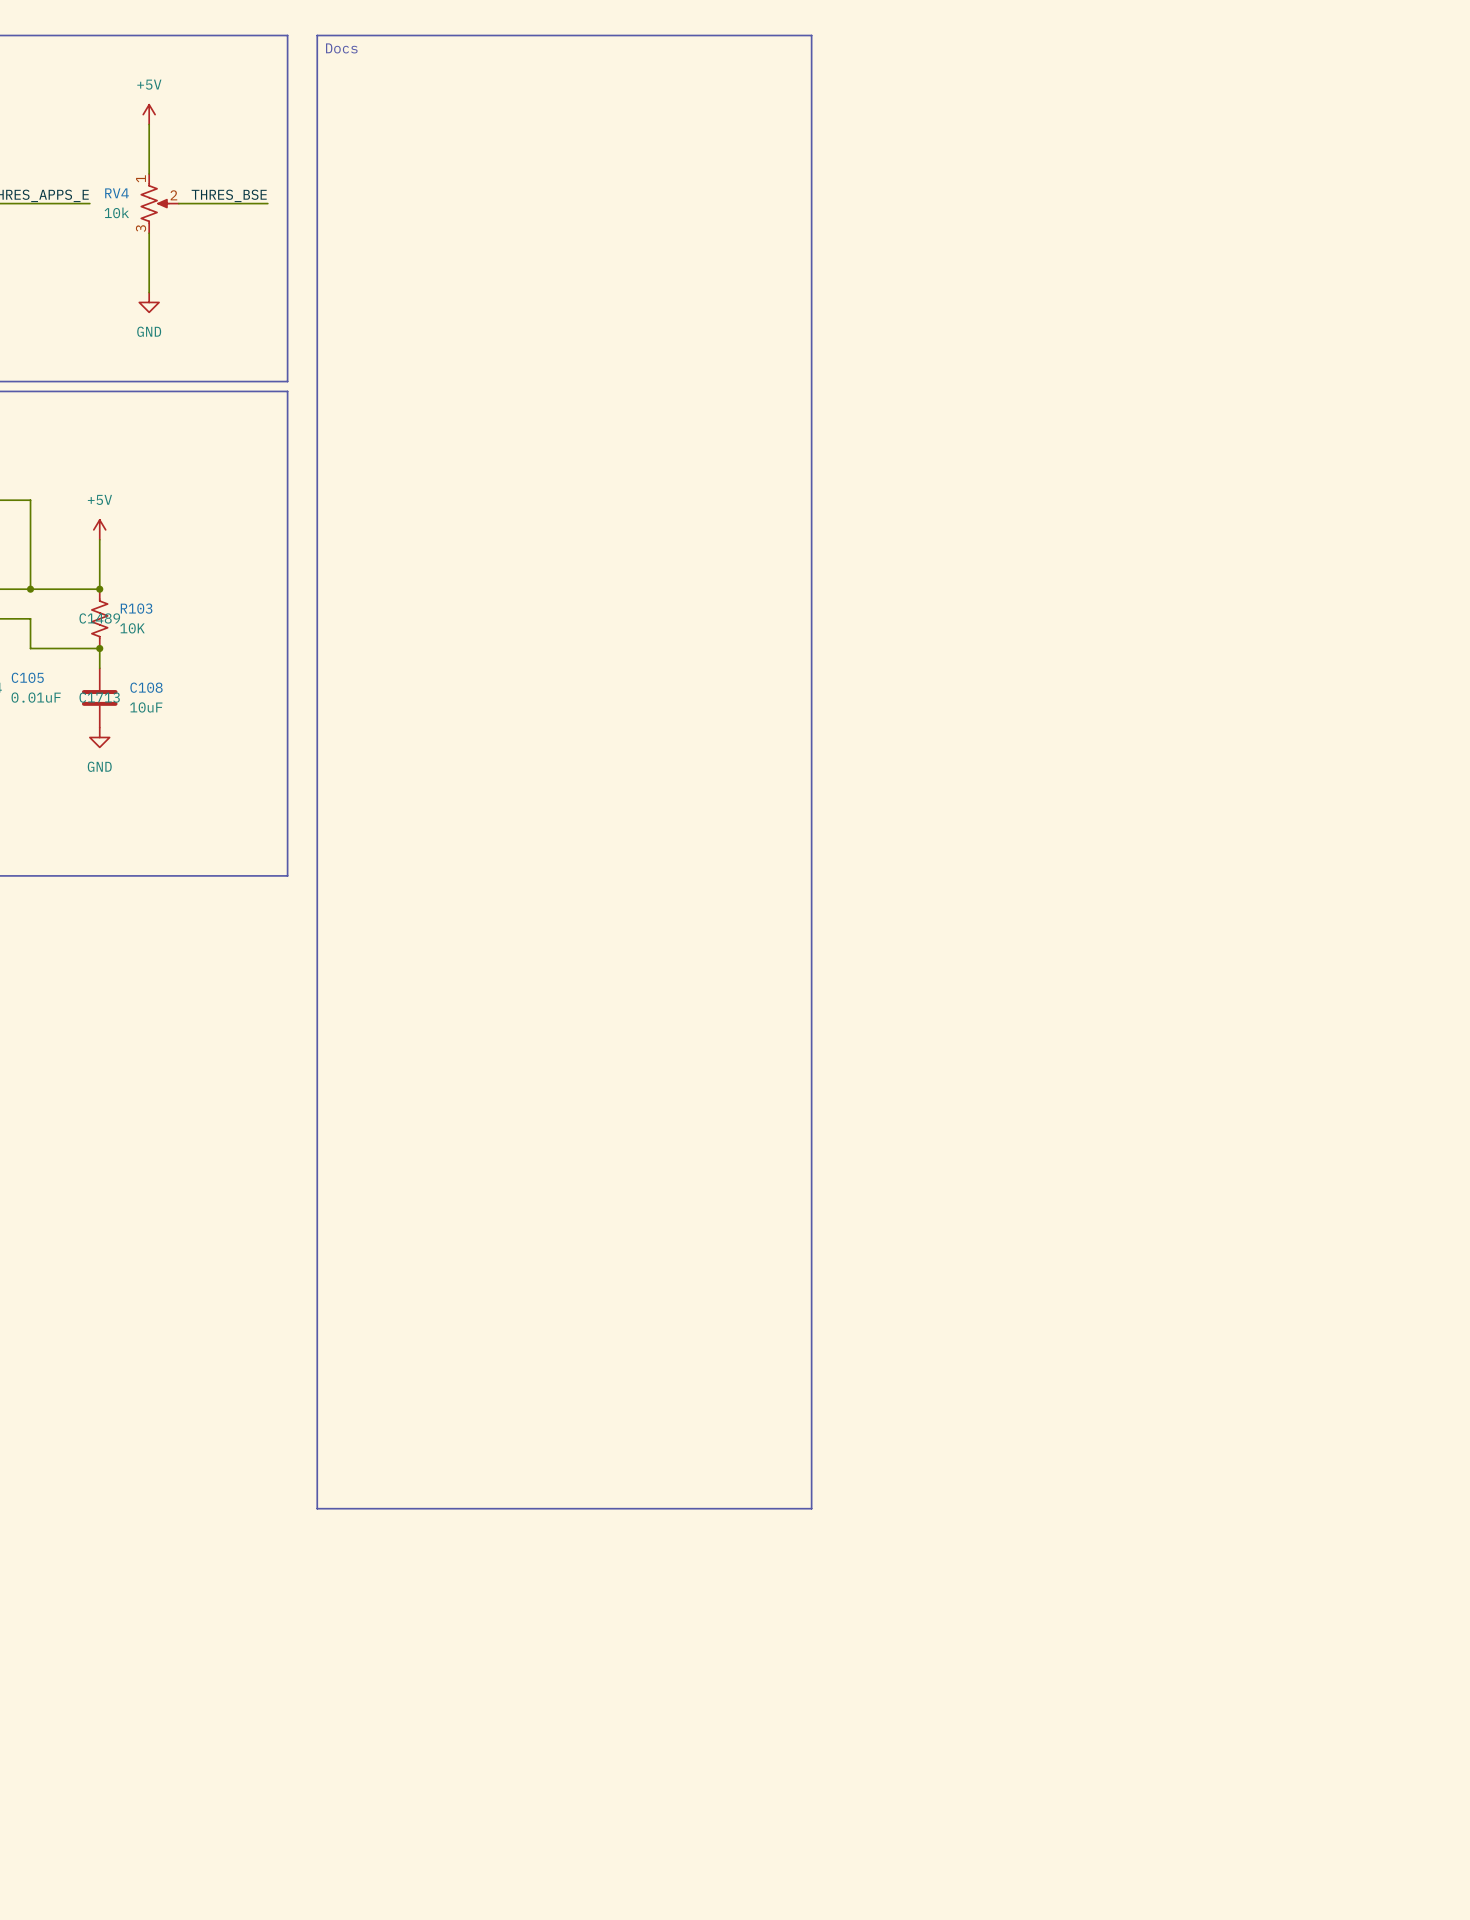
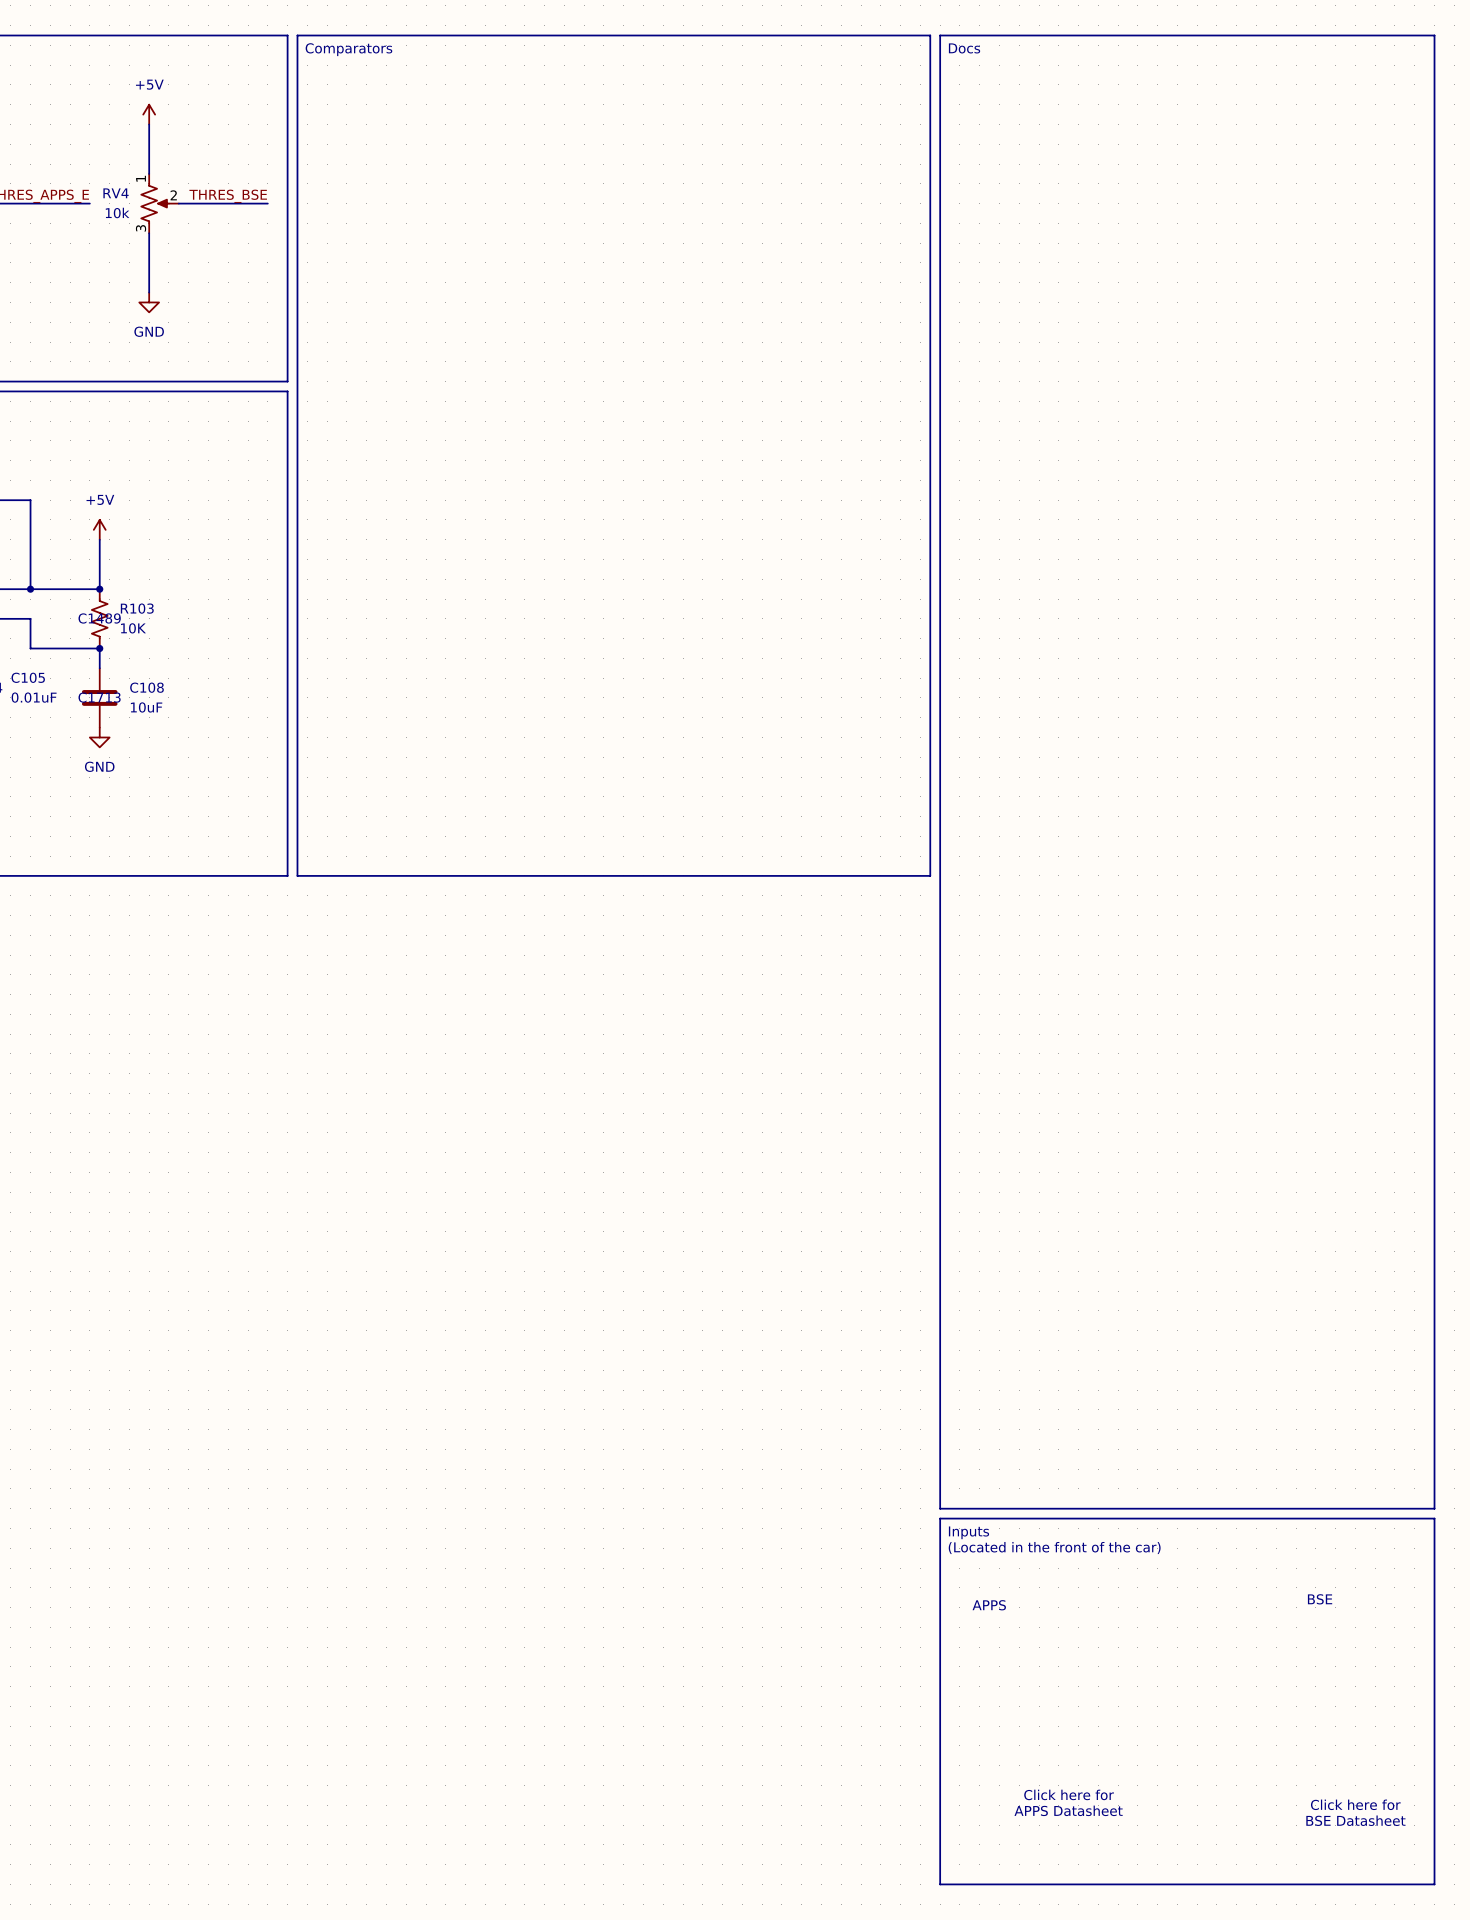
line: (317, 35) (317, 1508) (811, 1508) (811, 35) -> (317, 35) (297, 35) (297, 875) (930, 875) (930, 35) (811, 35)
line: none -> (940, 35) (1434, 35) (1434, 1508) (940, 1508) (940, 35)
text: Docs (341, 48) -> none
text: none -> Docs (964, 48)
text: none -> Comparators (348, 49)
line: none -> (940, 1518) (940, 1884) (1434, 1884) (1434, 1518) (940, 1518)
text: none -> Inputs (968, 1532)
text: none -> (Located in the front of the car) (1054, 1548)
text: none -> BSE (1320, 1599)
text: none -> APPS (989, 1605)
text: none -> Click here for (1069, 1794)
text: none -> Click here for (1355, 1804)
text: none -> APPS Datasheet (1068, 1810)
text: none -> BSE Datasheet (1355, 1820)

